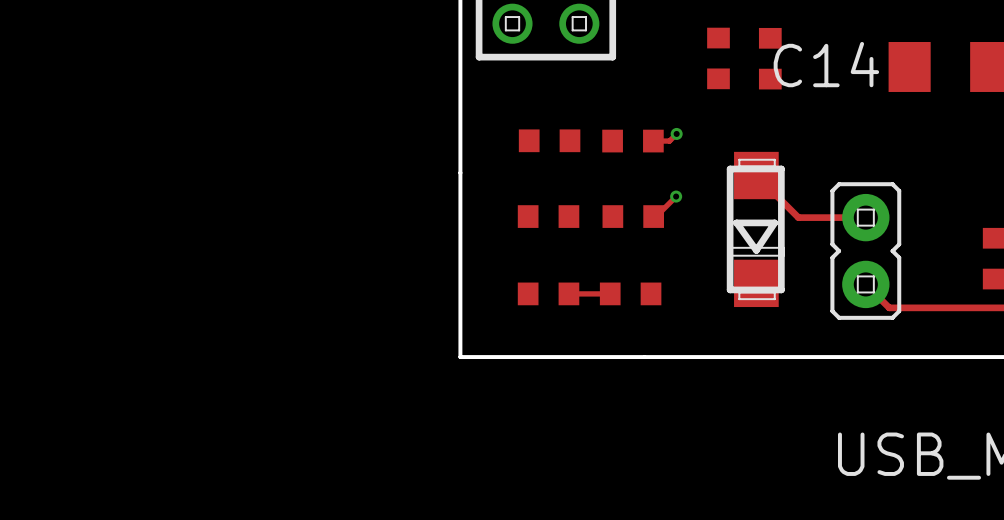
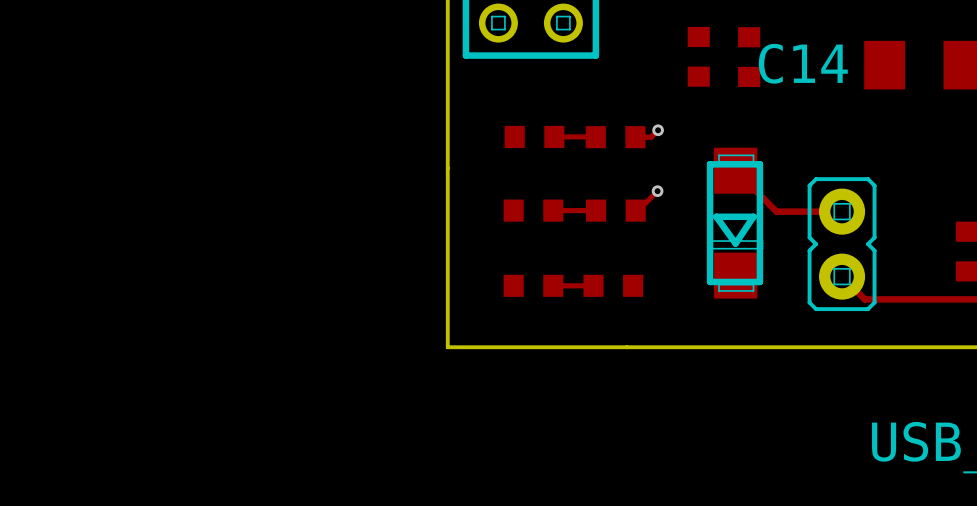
track: none -> (554, 136) (595, 136)
track: none -> (553, 210) (596, 210)

